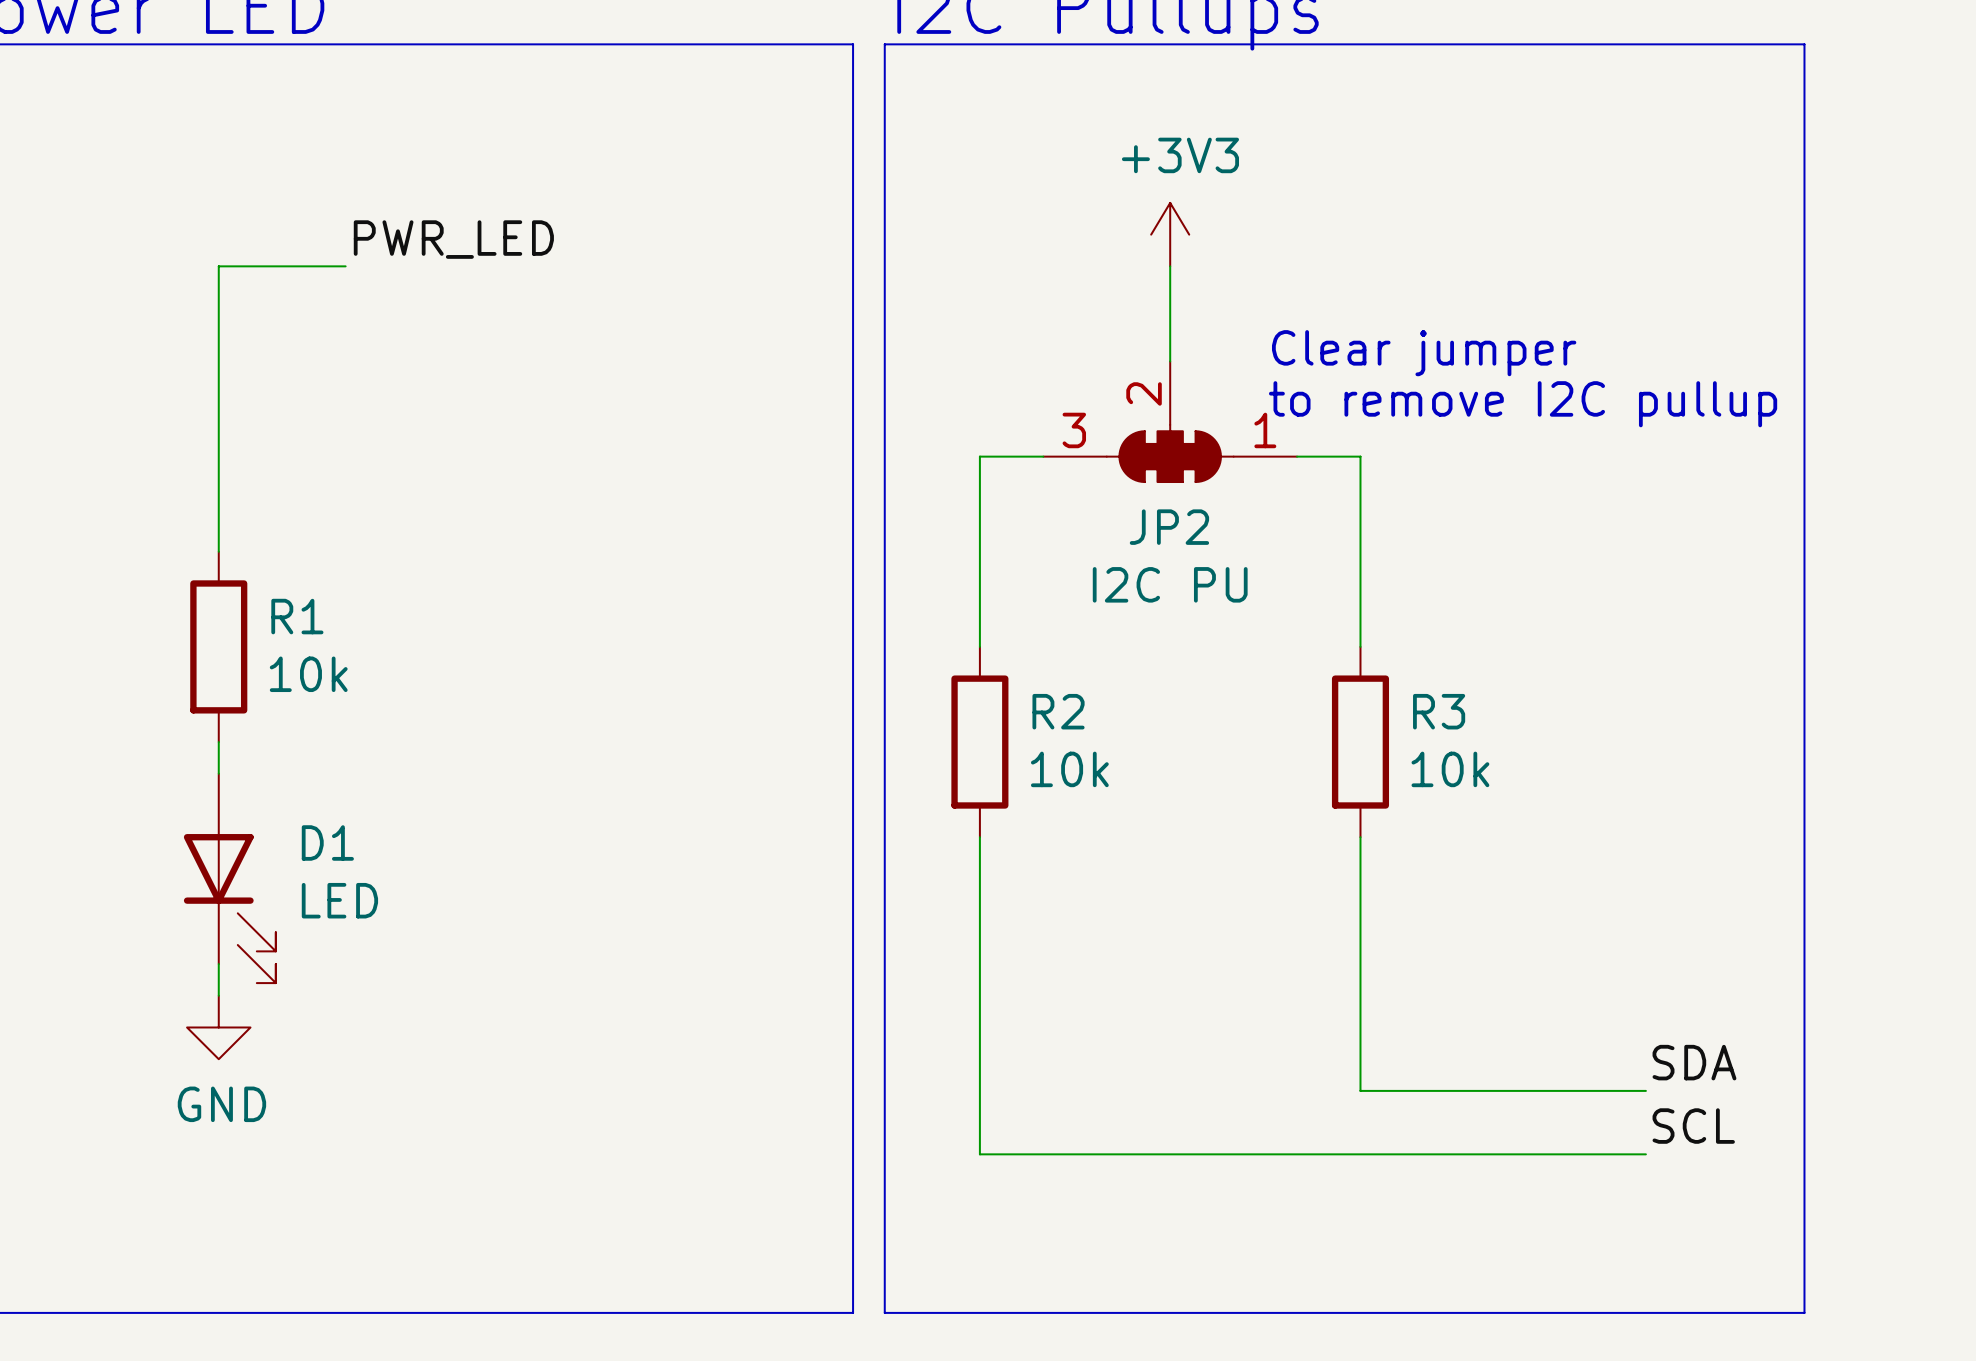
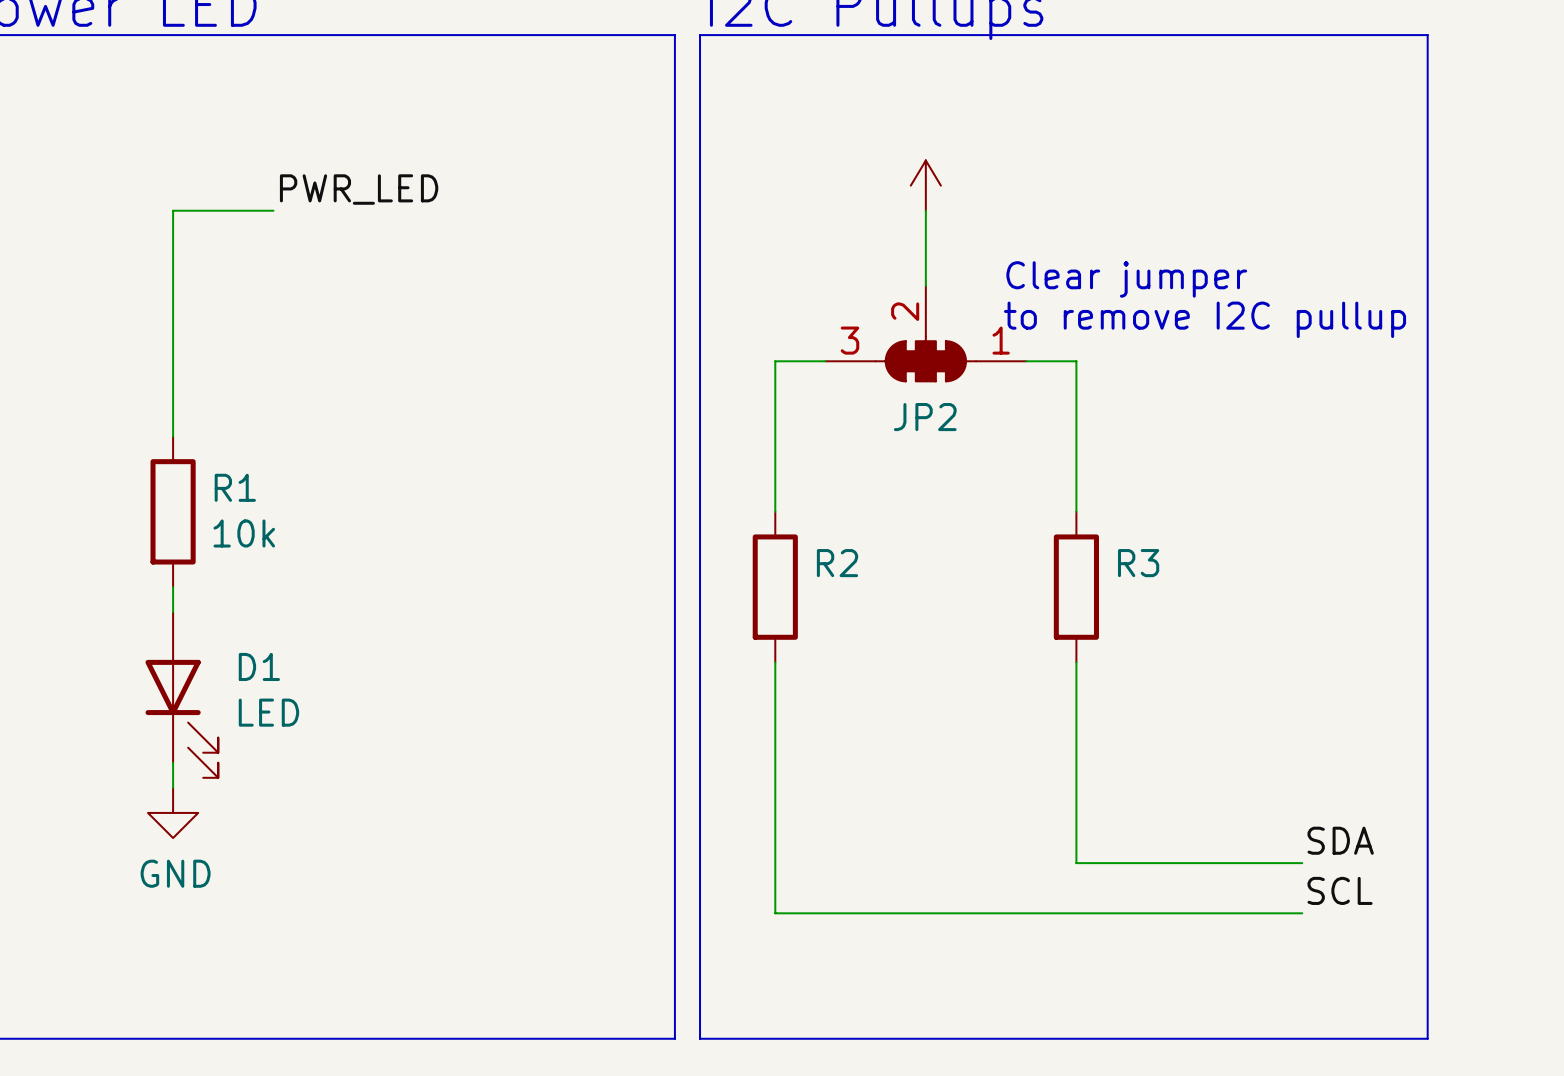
power symbol text: +3V3 (1180, 155) -> none
JP2 value: I2C PU (1170, 584) -> none
R2 value: 10k (1069, 769) -> none
R3 value: 10k (1450, 769) -> none

